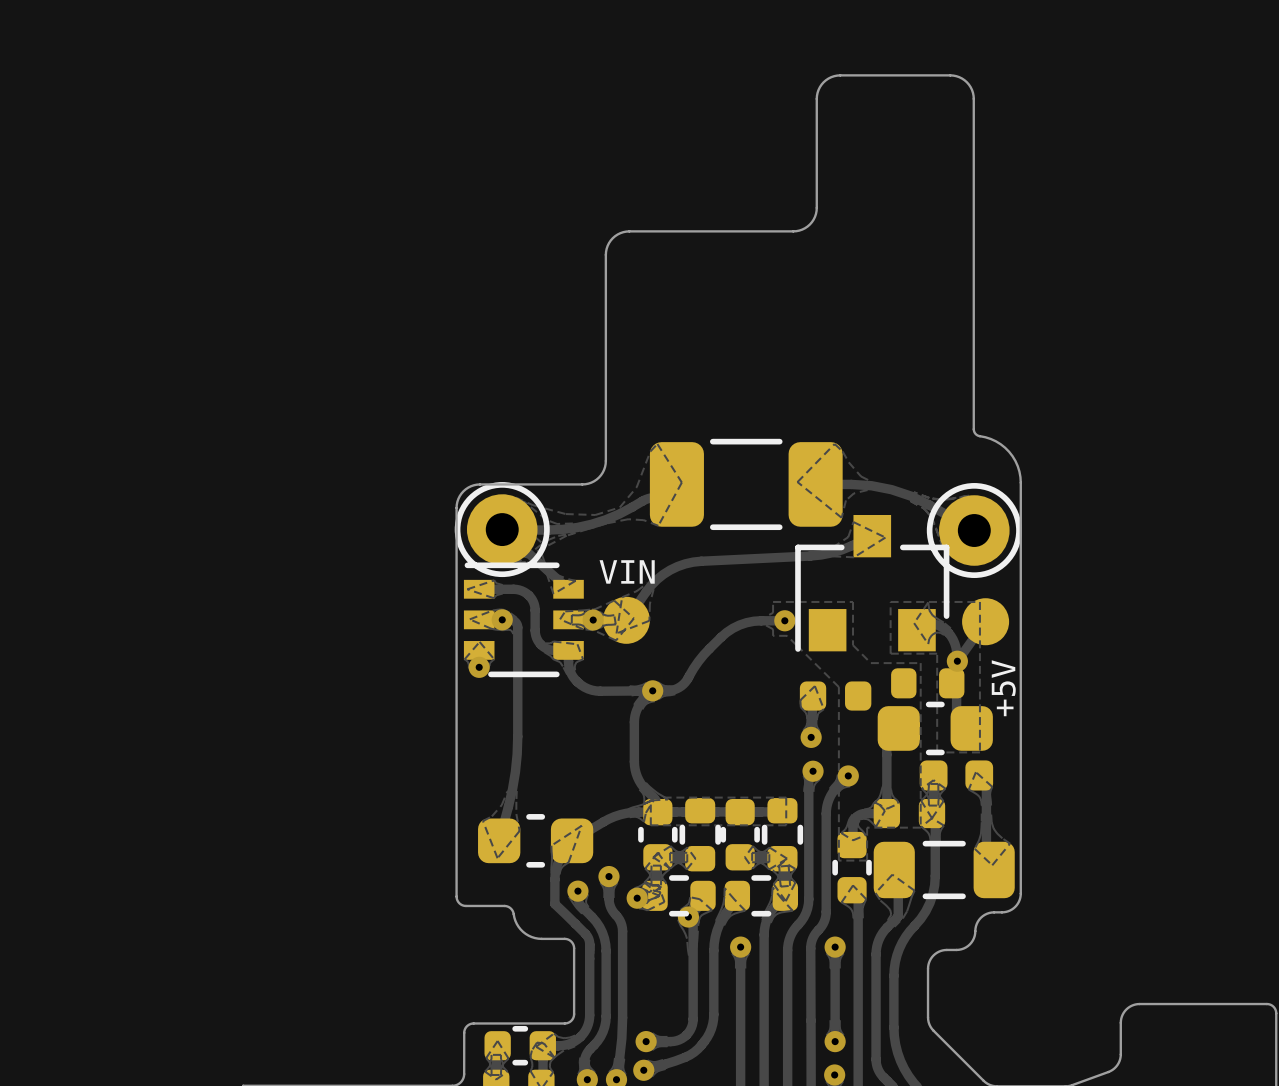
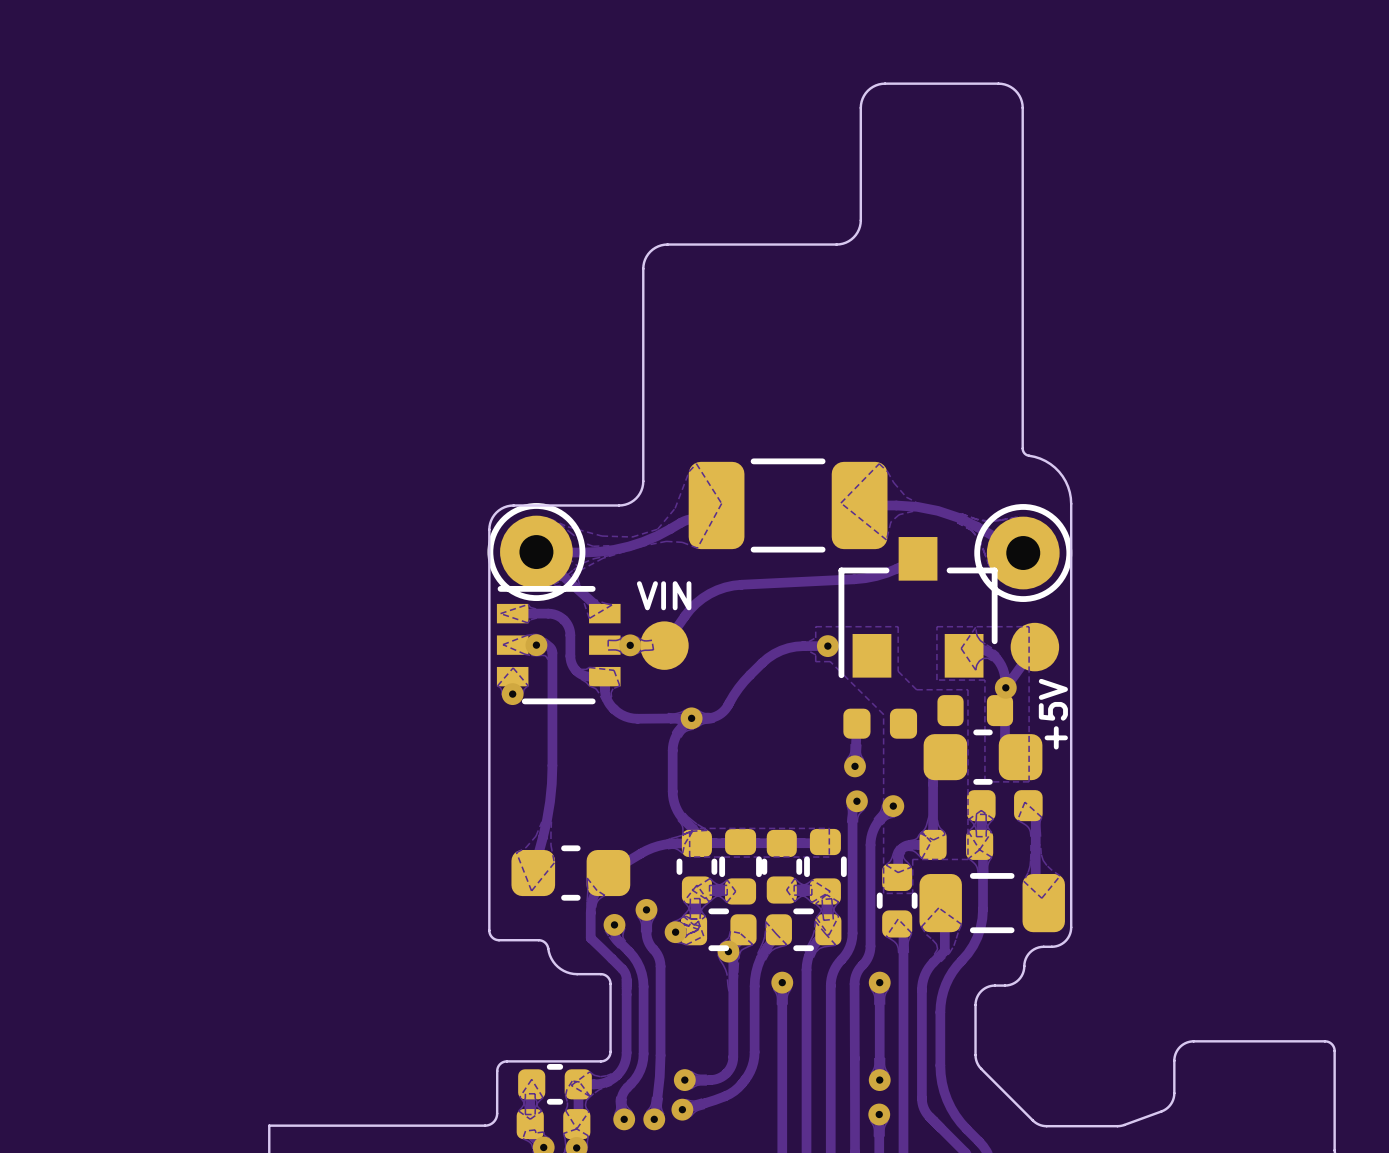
zone outline: (853, 522) (848, 537) (832, 547) (833, 556) (853, 557) (885, 537) (853, 522) -> none
zone outline: (647, 583) (636, 591) (622, 597) (616, 633) (649, 620) (649, 603) (653, 589) (647, 583) -> none
zone outline: (614, 600) (594, 609) (565, 611) (560, 619) (583, 629) (593, 630) (616, 640) (633, 618) (614, 600) -> none
zone outline: (814, 686) (800, 700) (800, 707) (805, 712) (807, 719) (816, 719) (818, 713) (823, 709) (814, 686) -> none
zone outline: (551, 845) (581, 825) (568, 862) -> (587, 878) (597, 890) (604, 895)

